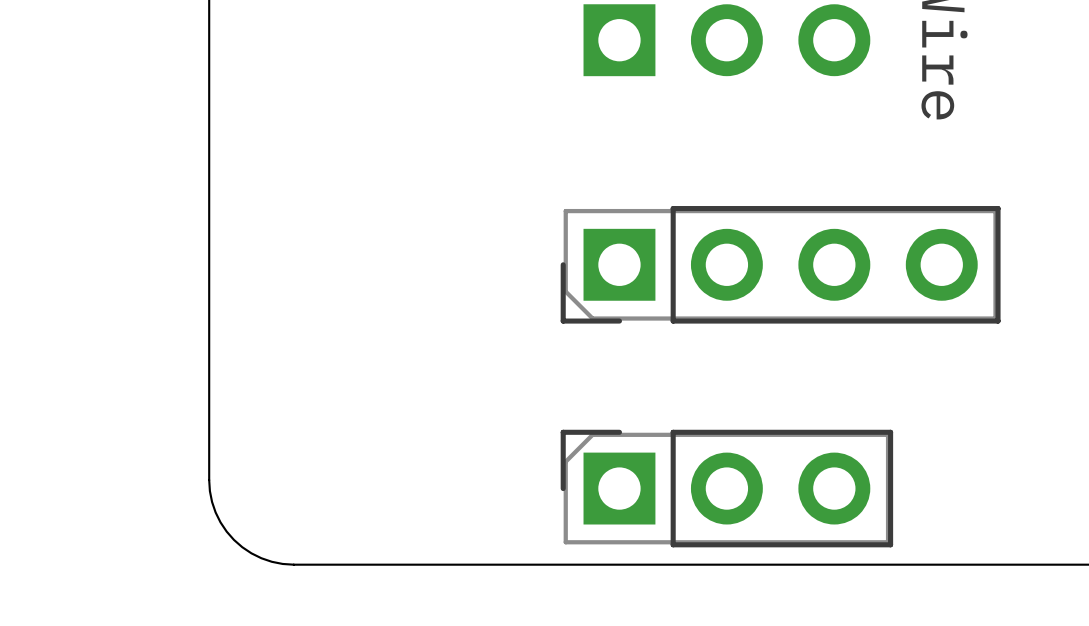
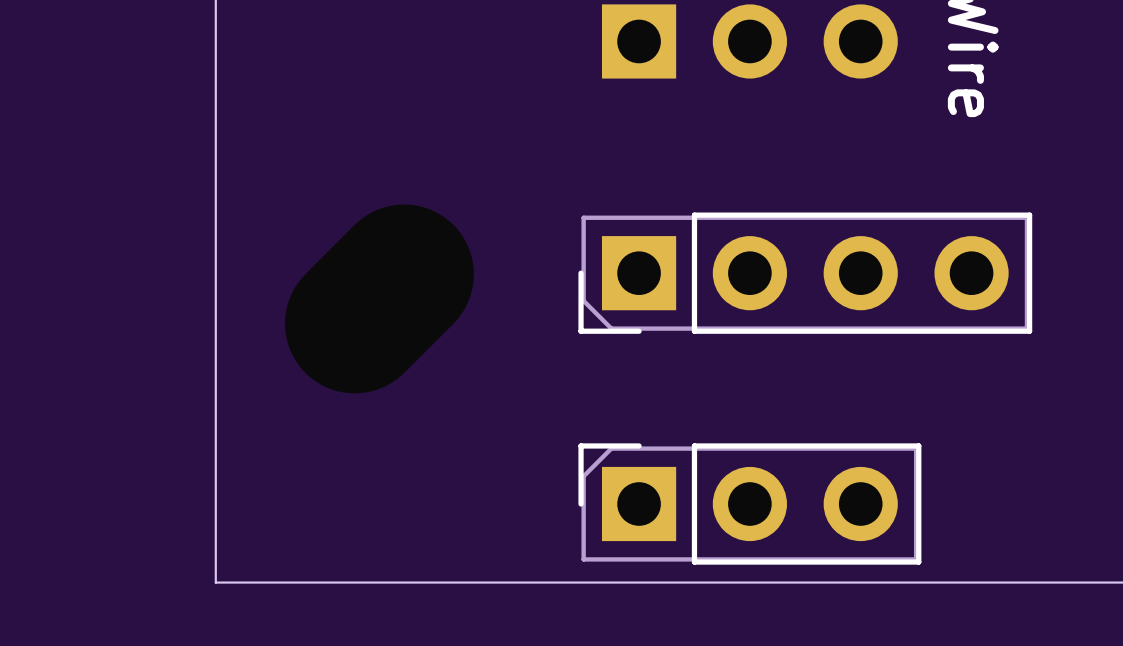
board edge: (209, 480) (215, 512) (233, 539) (261, 558) (293, 564) -> (215, 495) (215, 582) (303, 582)

